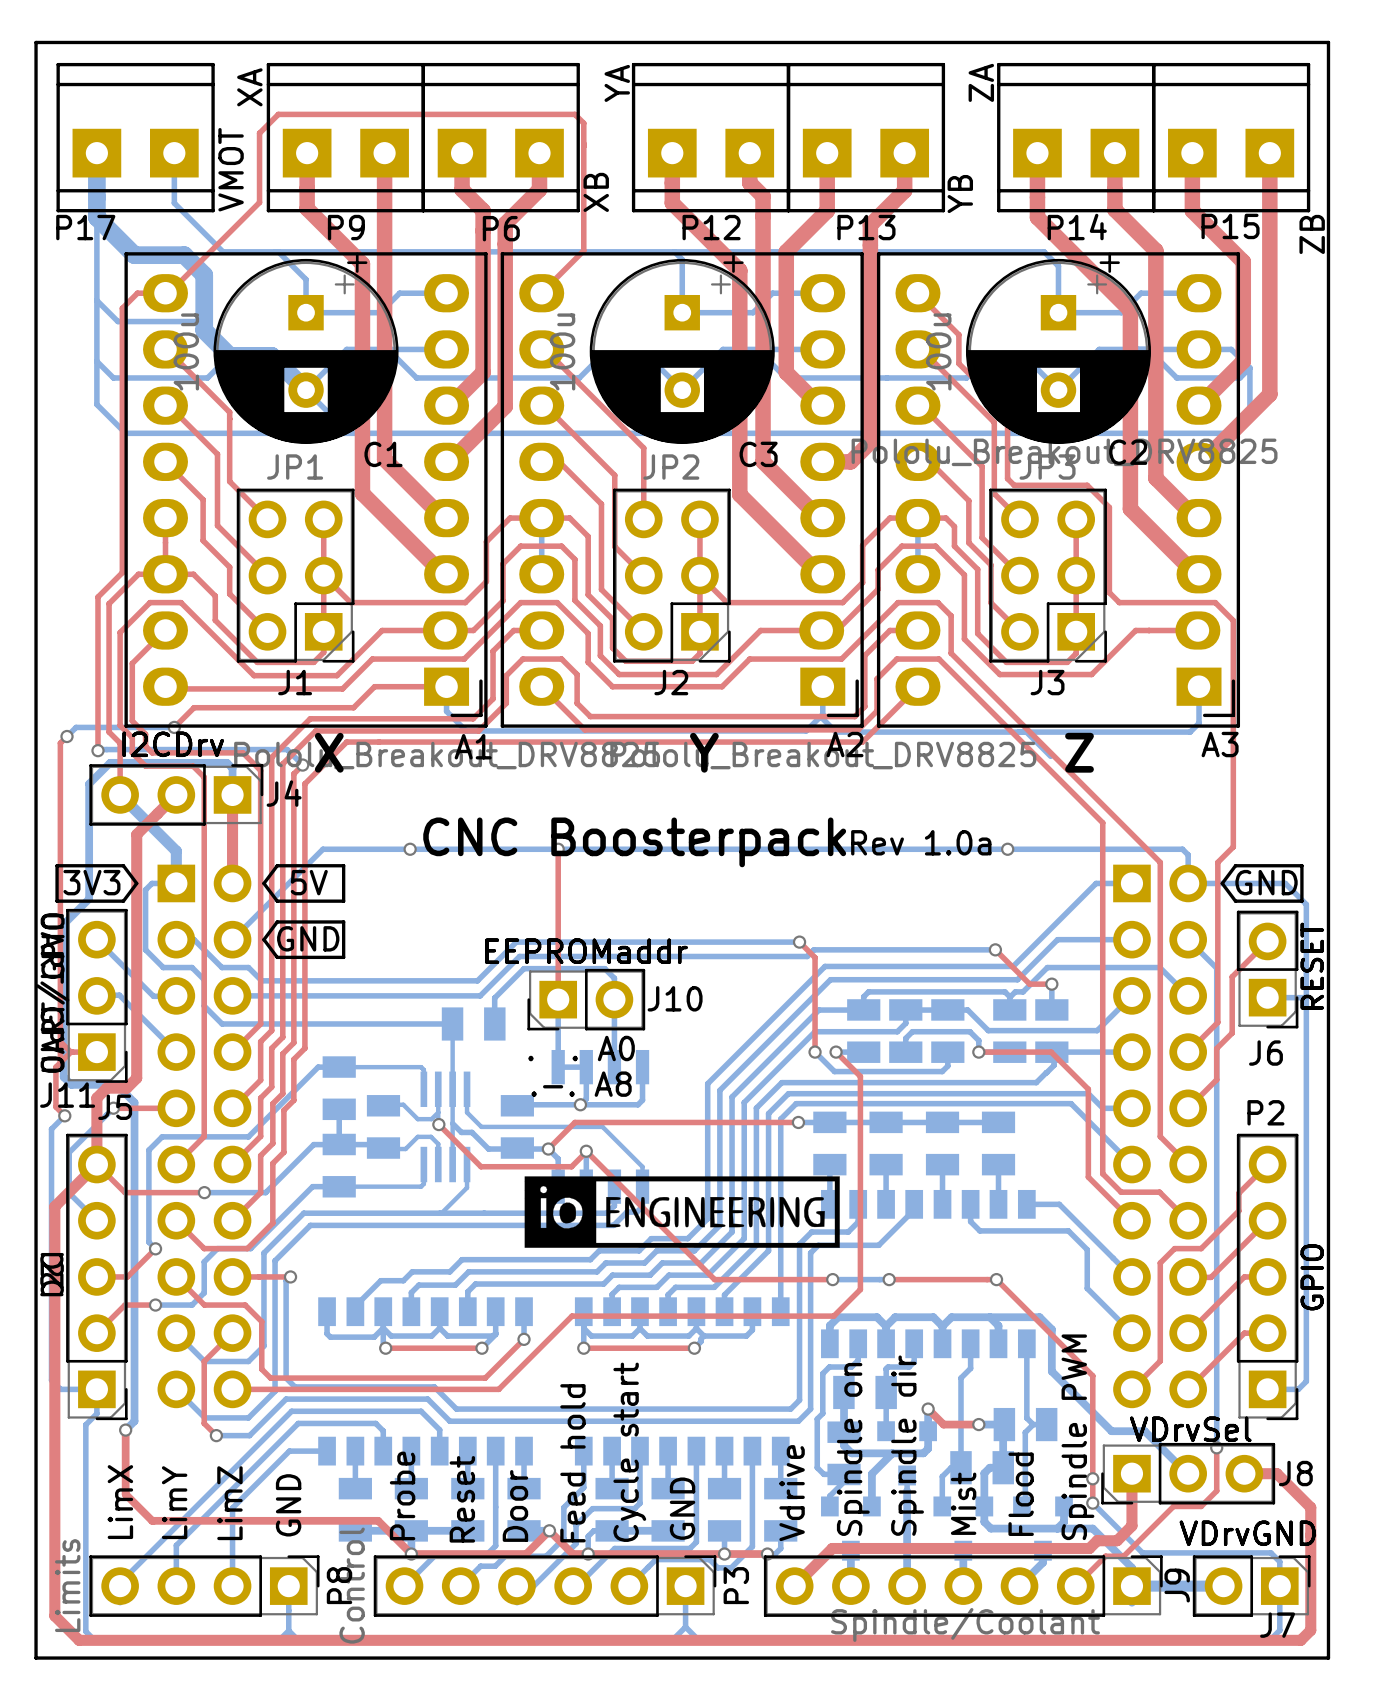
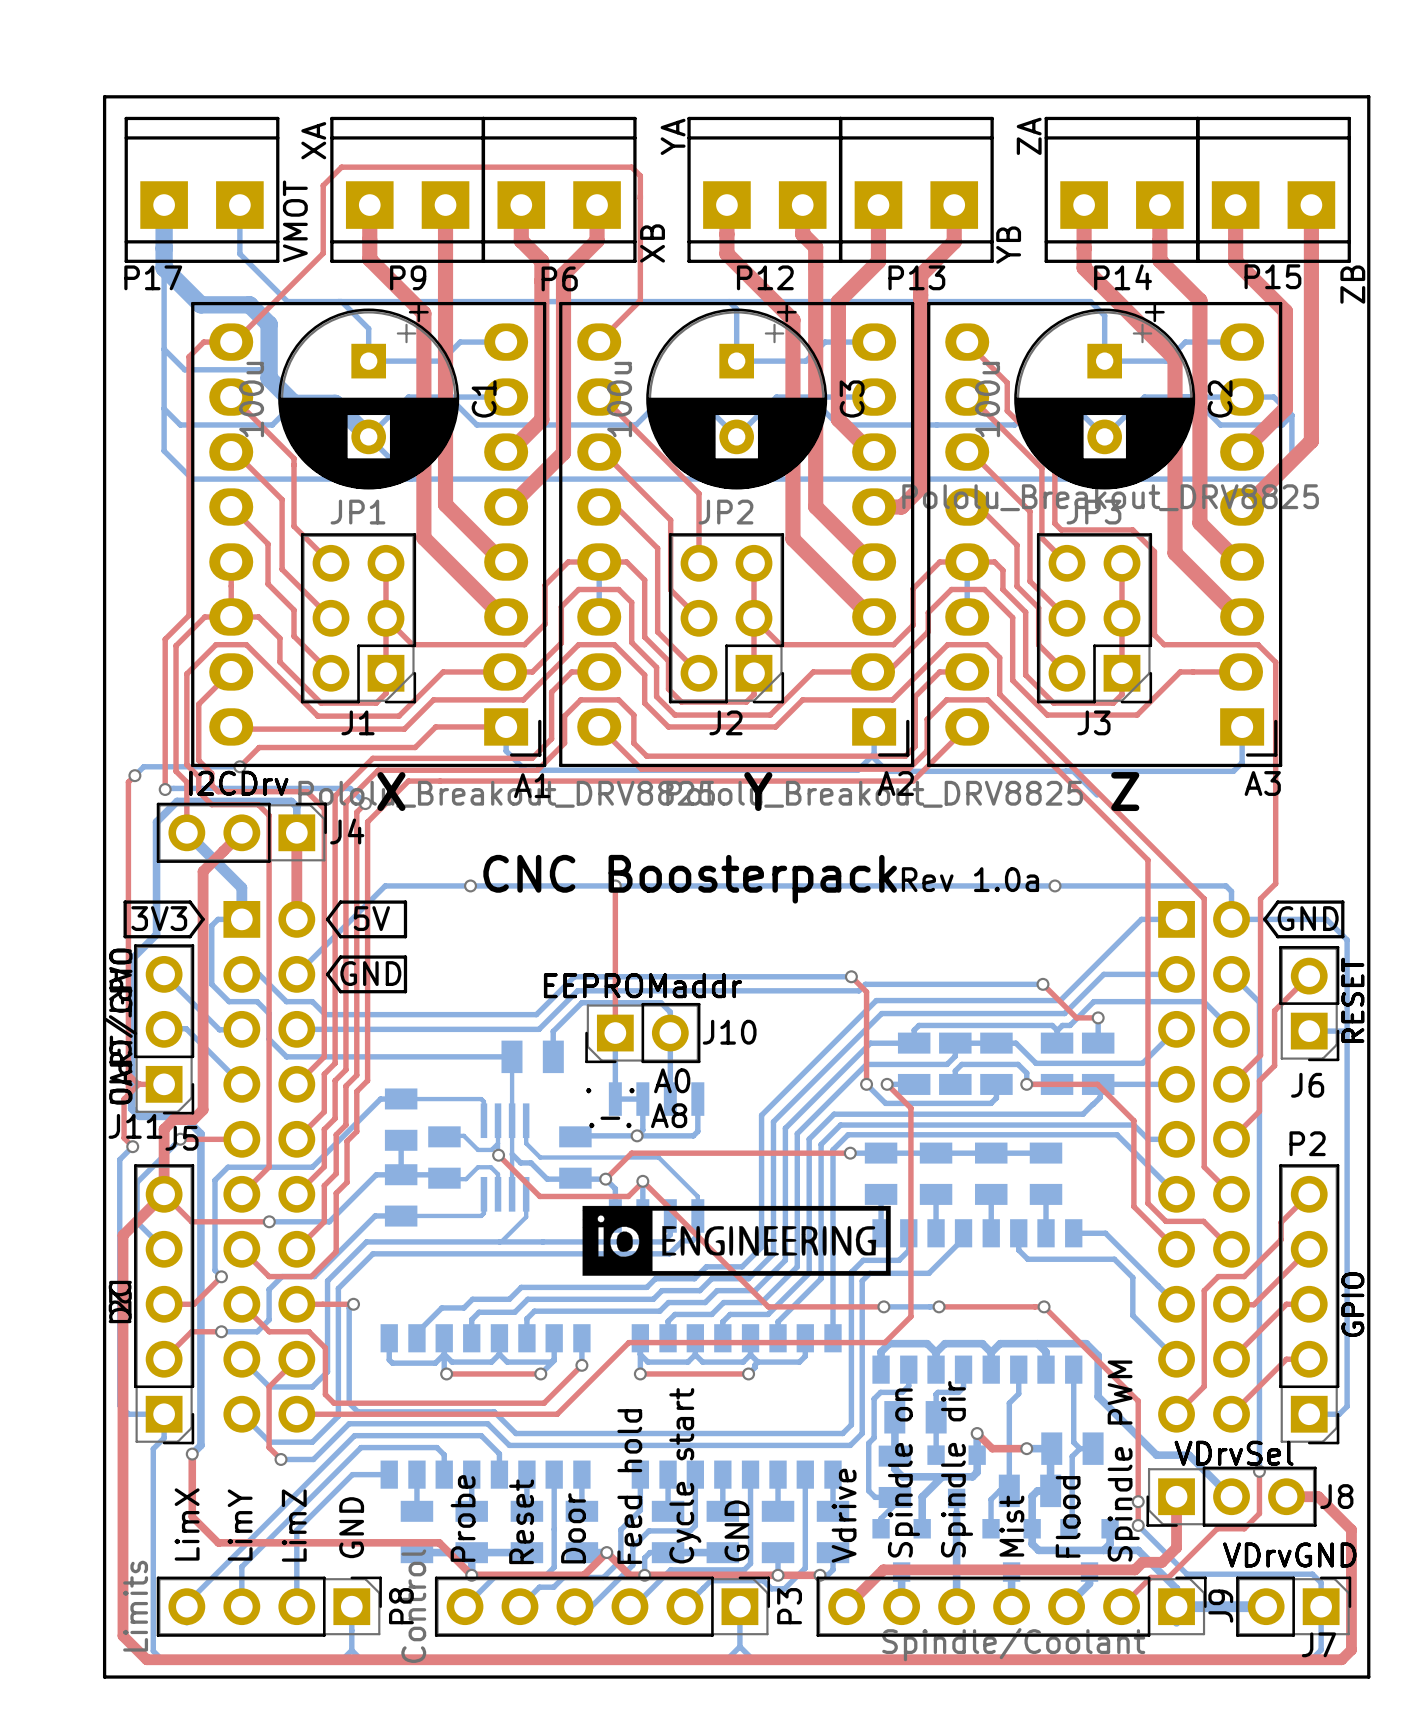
C2 name rotation: 0° (1128, 452) -> 90° counterclockwise (1220, 399)
C2 name position: C2 (1128, 452) -> C2 (1220, 399)
C1 name rotation: 0° (383, 454) -> 90° counterclockwise (484, 399)
C1 name position: C1 (383, 454) -> C1 (484, 399)
C3 name rotation: 0° (758, 454) -> 90° counterclockwise (852, 399)
C3 name position: C3 (758, 454) -> C3 (852, 399)

